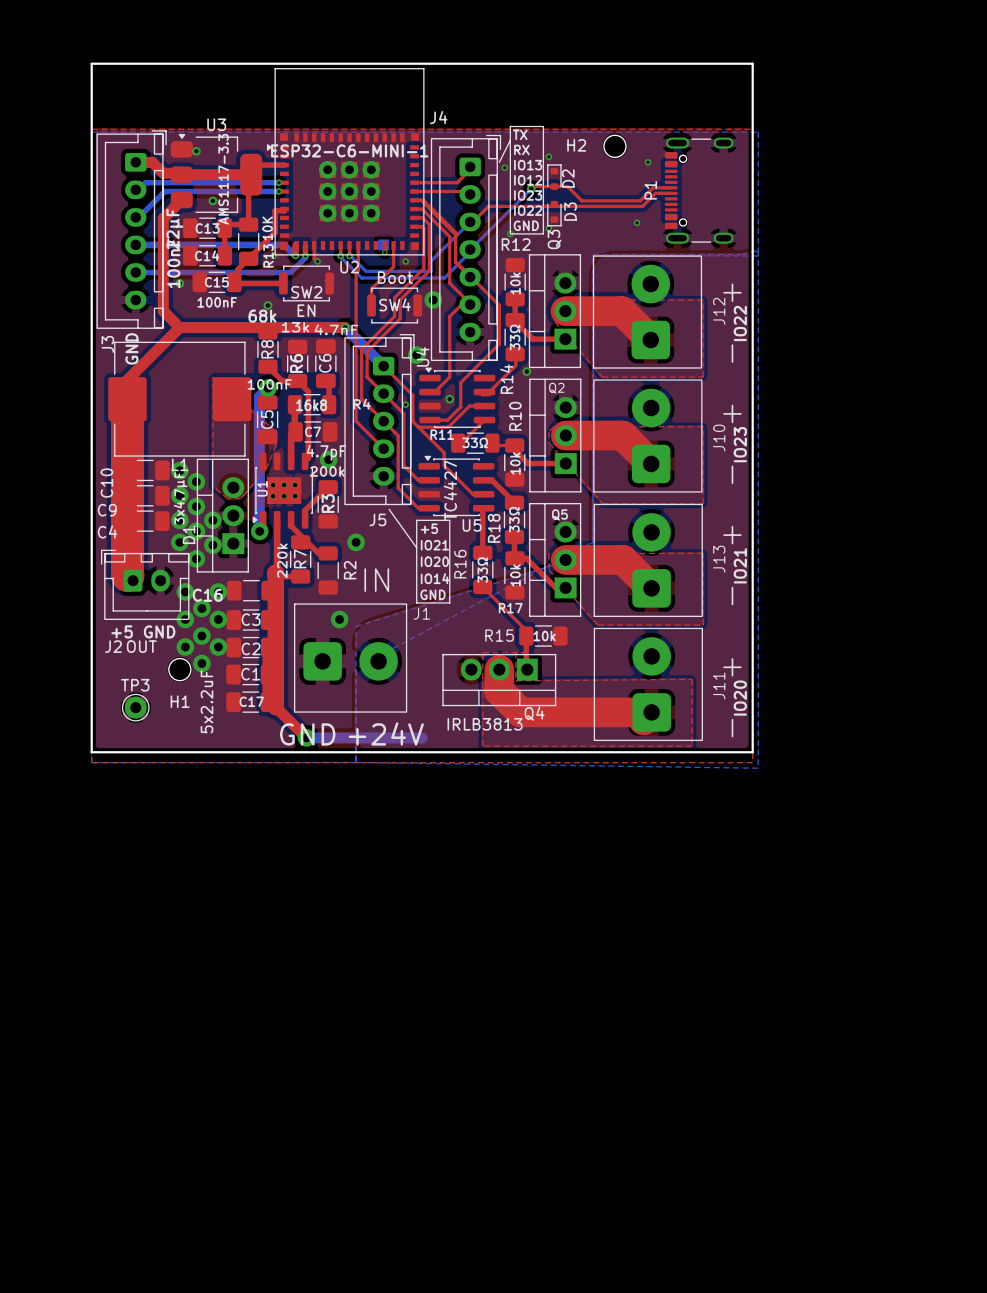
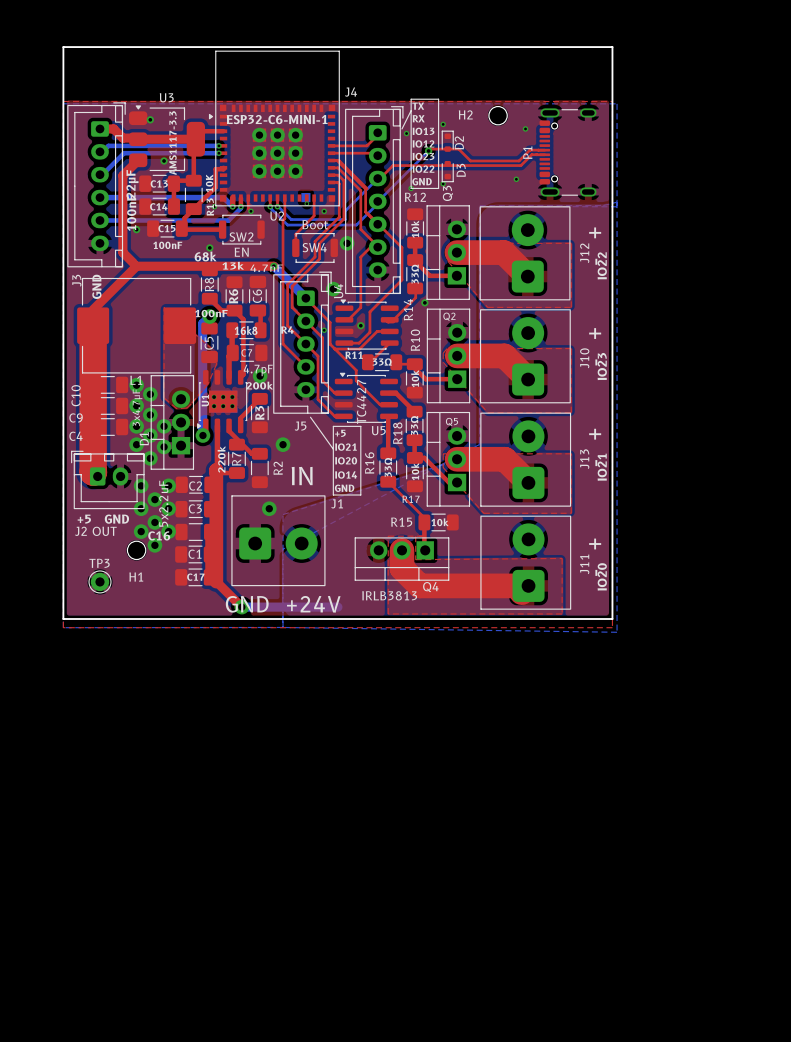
C16 name: C16 (207, 595) -> C2 (195, 486)
C2 name: C2 (251, 648) -> C16 (159, 535)
text position: 5x2.2uF (206, 701) -> 5x2.2uF (163, 503)

